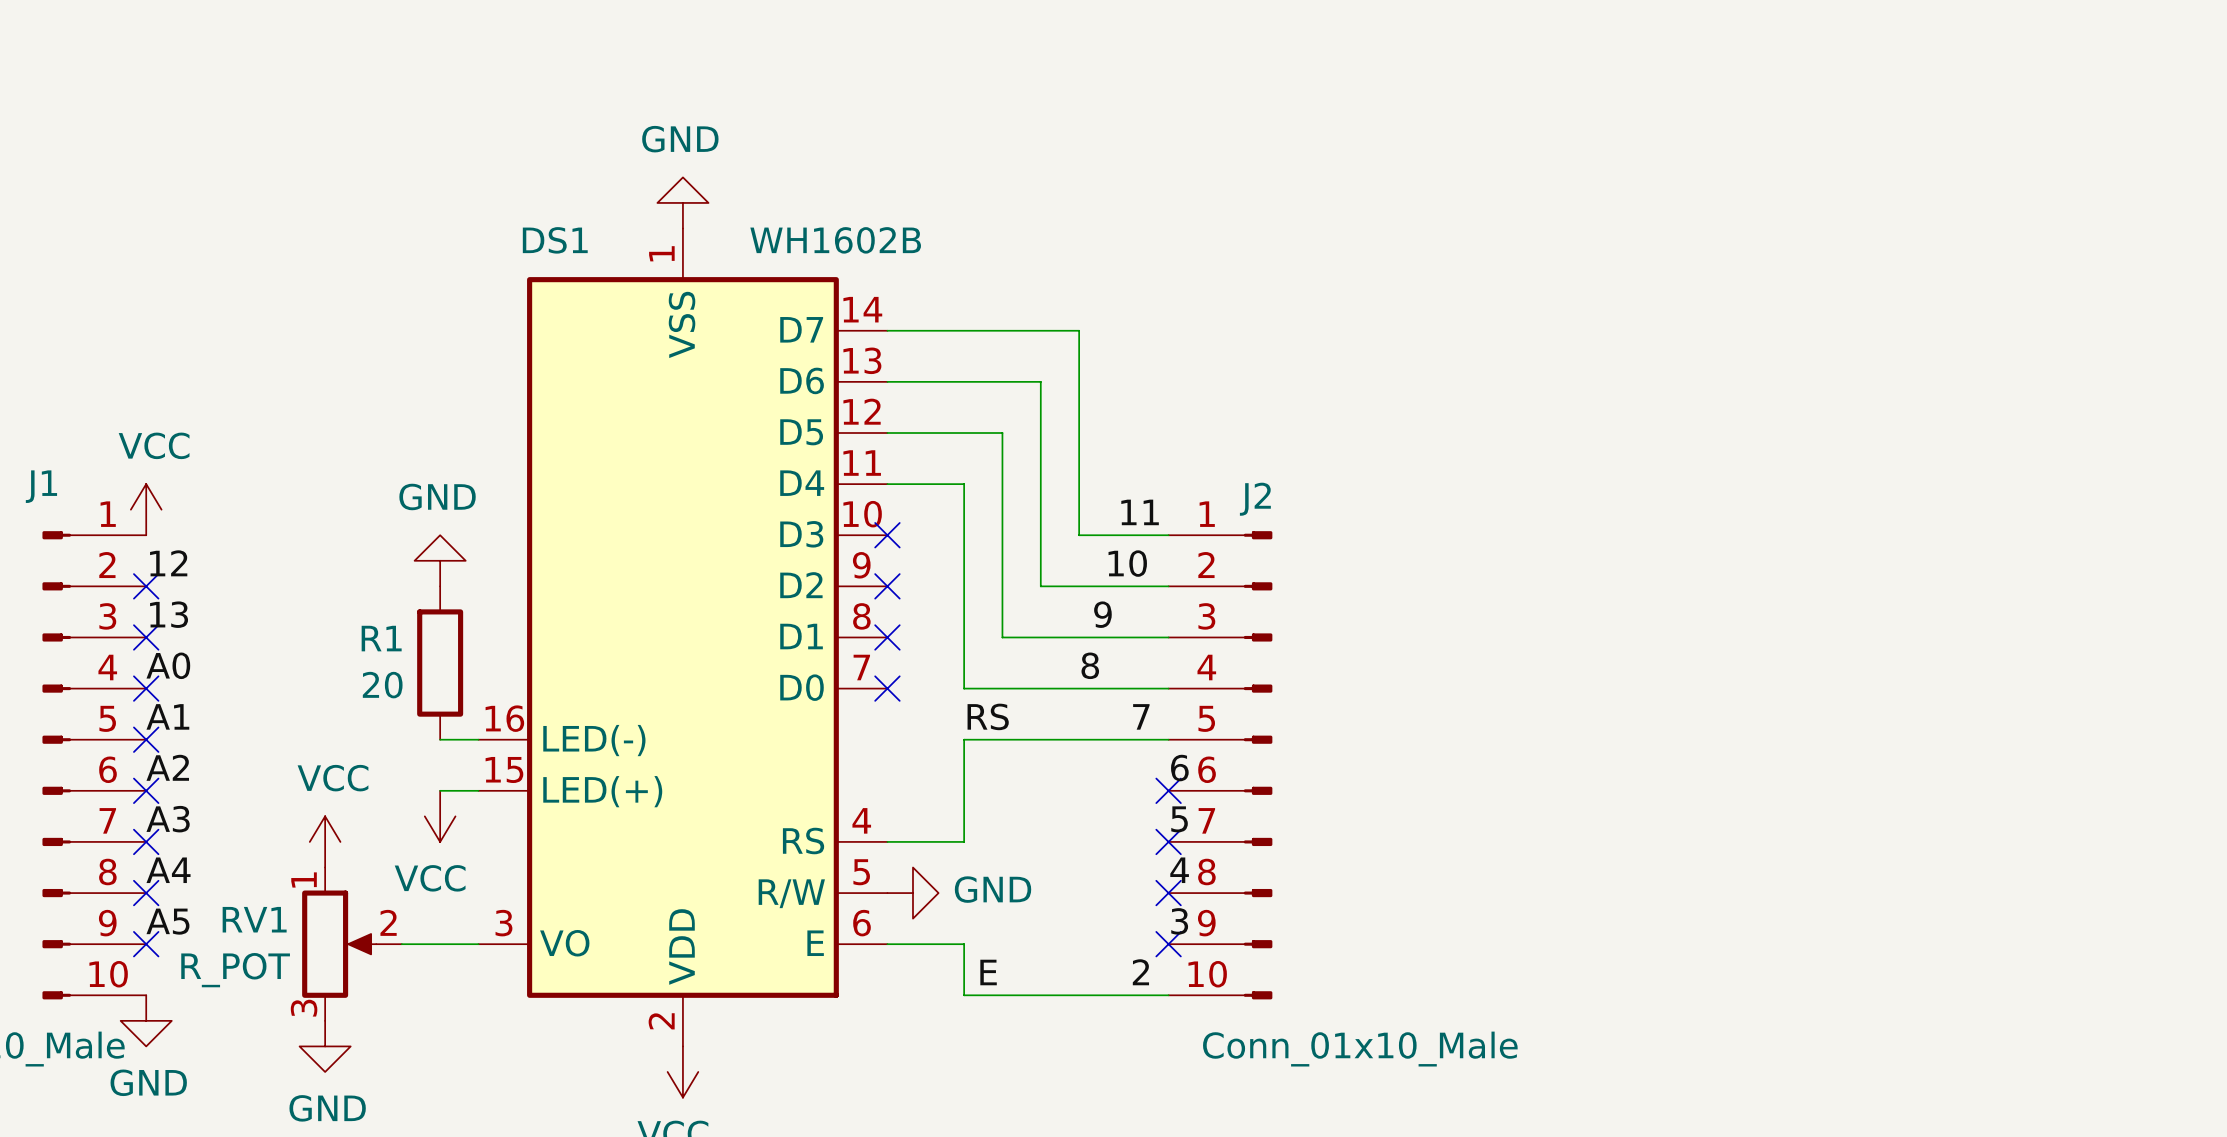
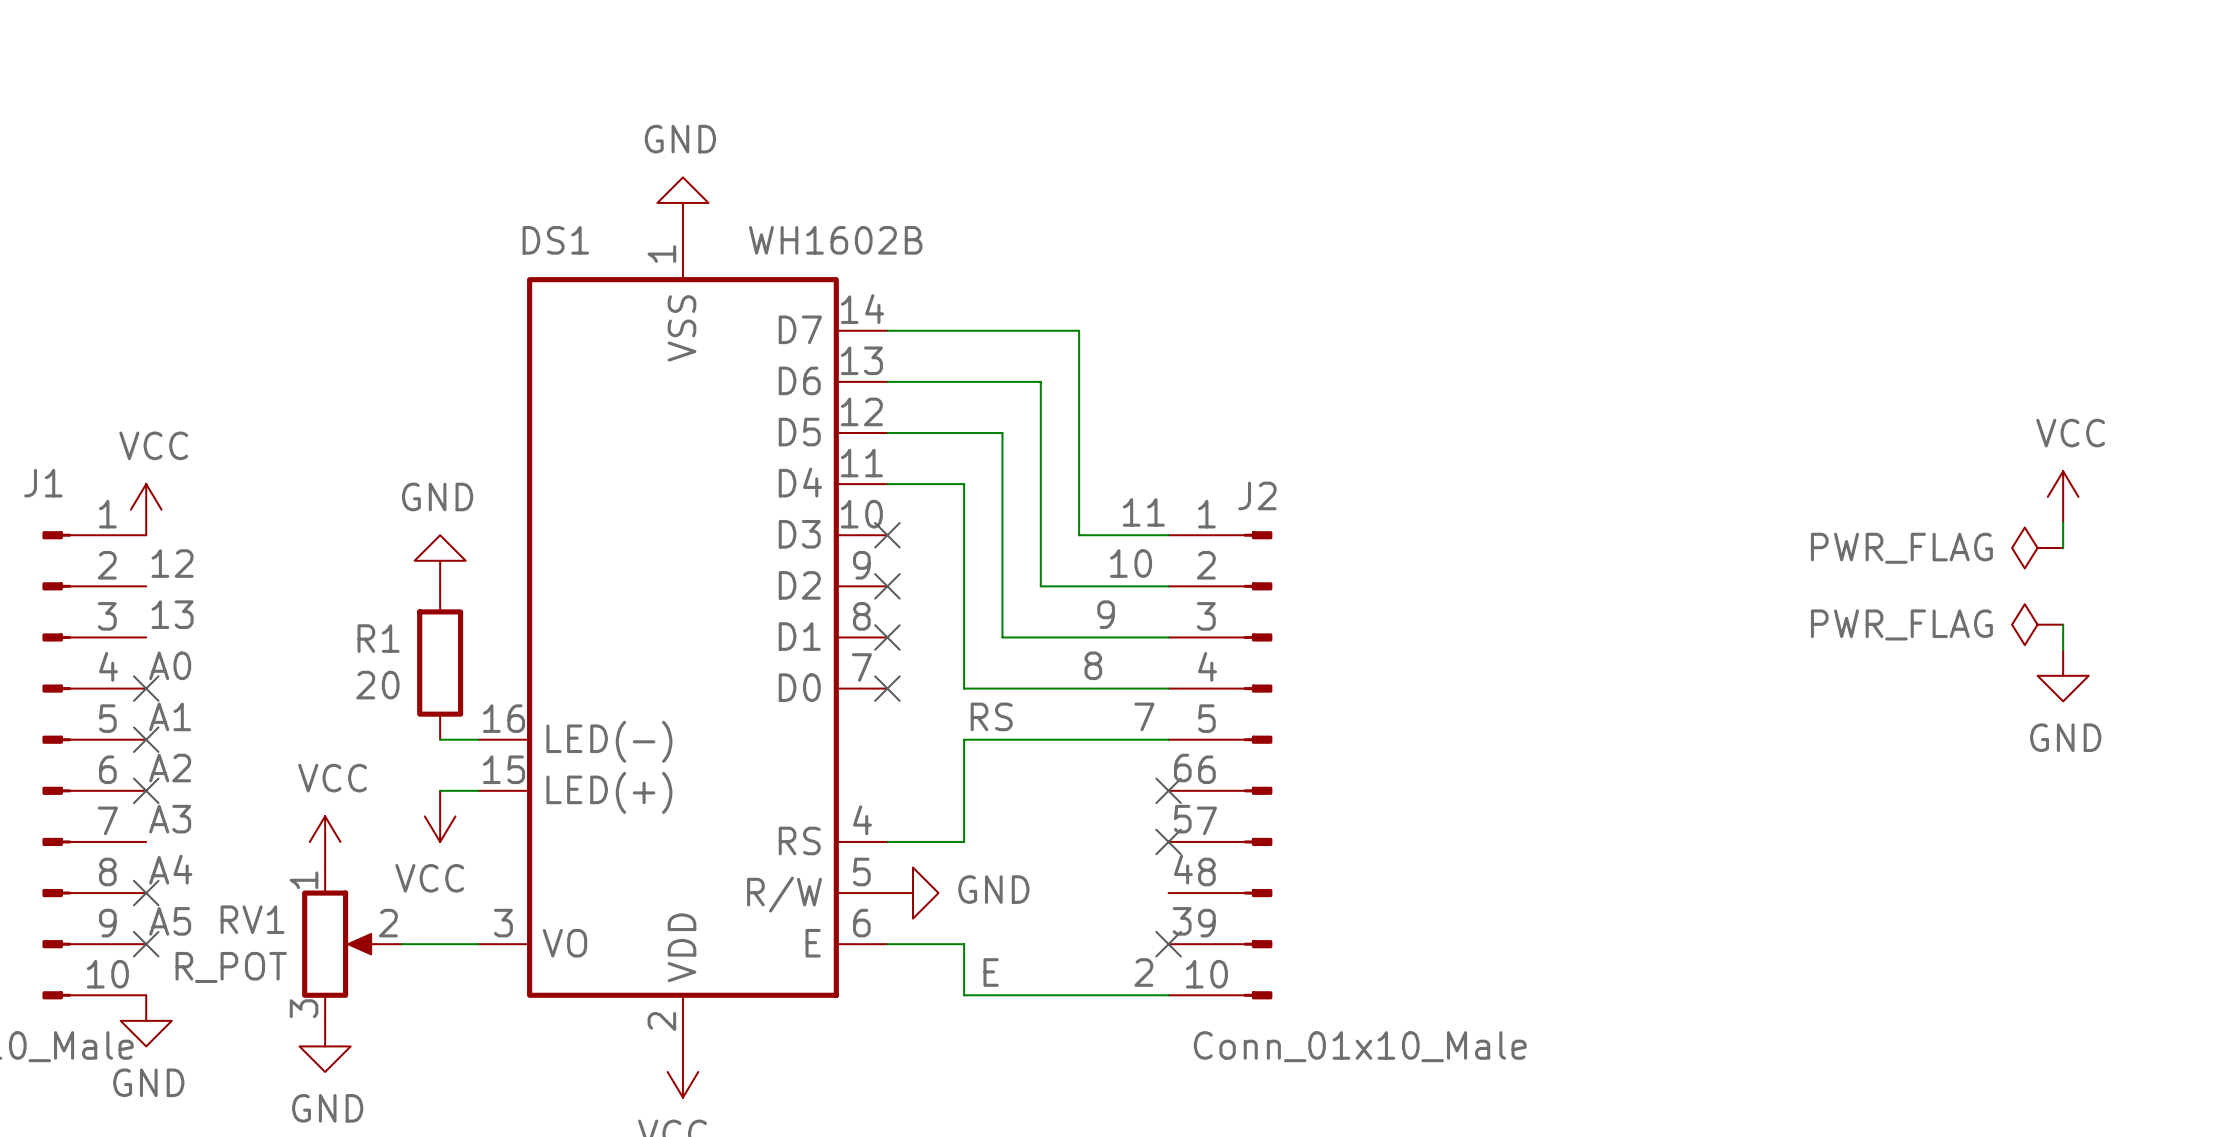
power symbol: none -> VCC (2063, 496)
wire: none -> (2063, 522) (2063, 548)
power symbol: none -> PWR_FLAG (2037, 548)
no-connect mark: (146, 586) -> none
power symbol: none -> PWR_FLAG (2037, 624)
wire: none -> (2063, 624) (2063, 650)
no-connect mark: (146, 637) -> none
power symbol: none -> GND (2063, 675)
no-connect mark: (146, 841) -> none
no-connect mark: (1168, 893) -> none

